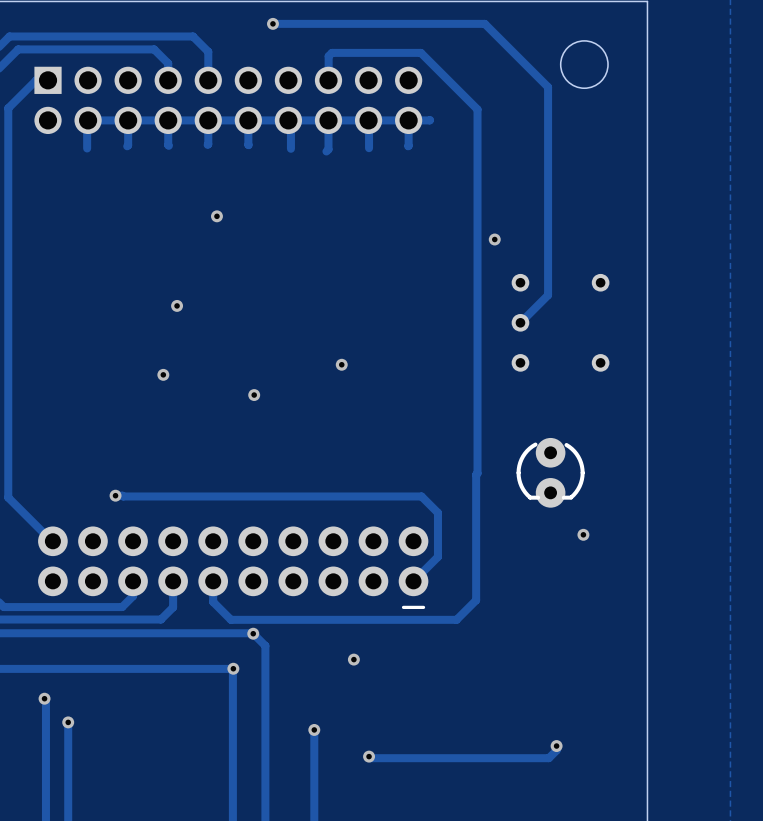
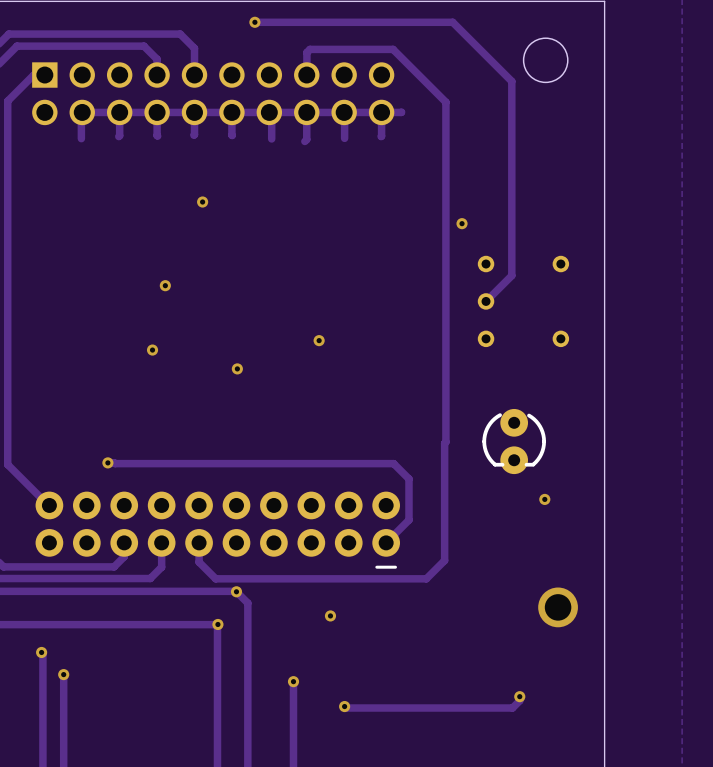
via: none -> (558, 607)

